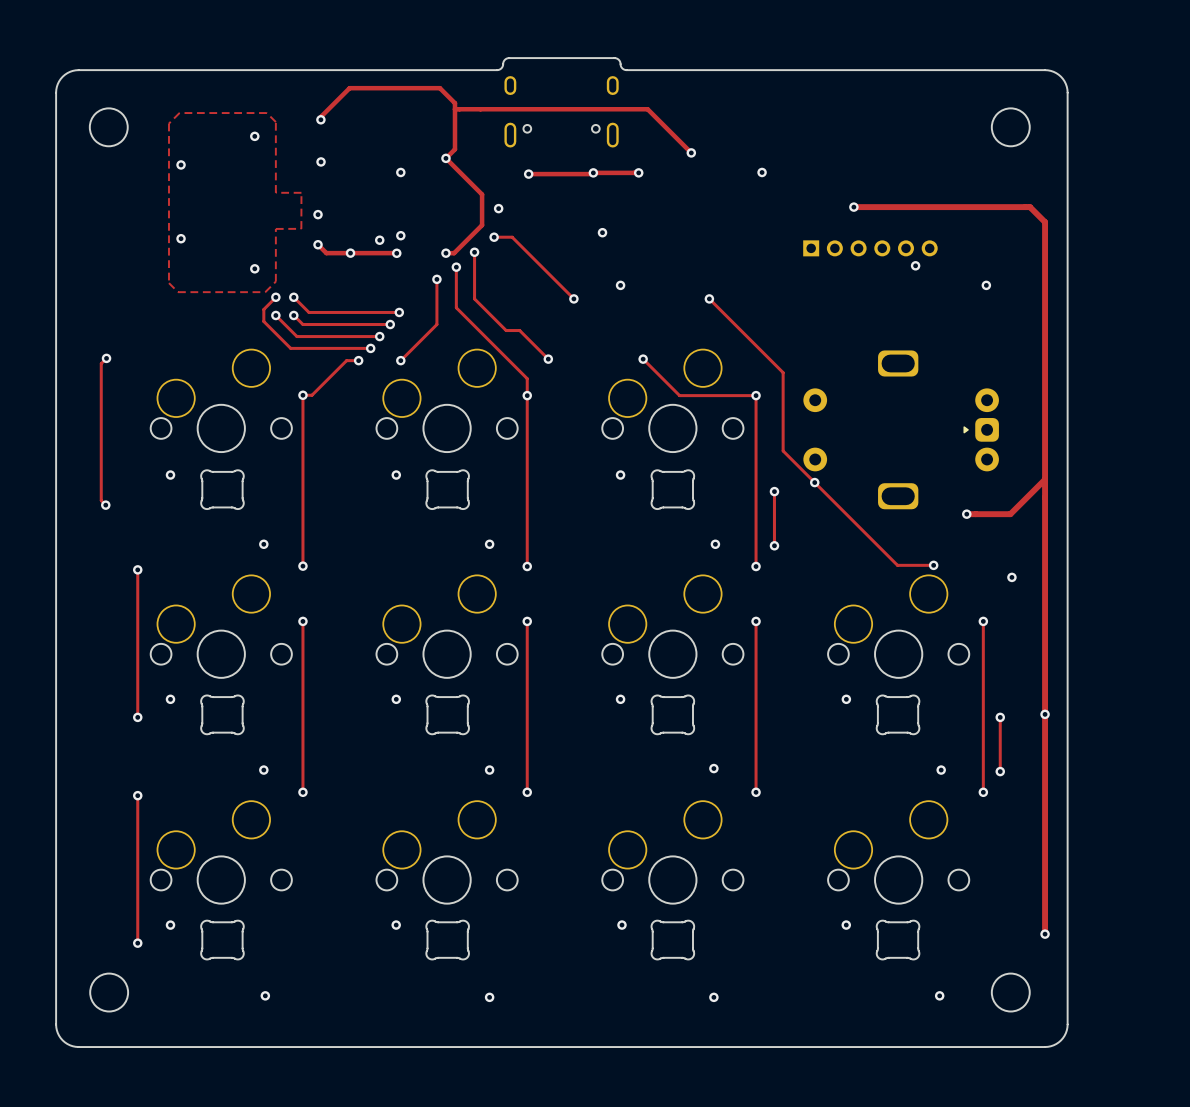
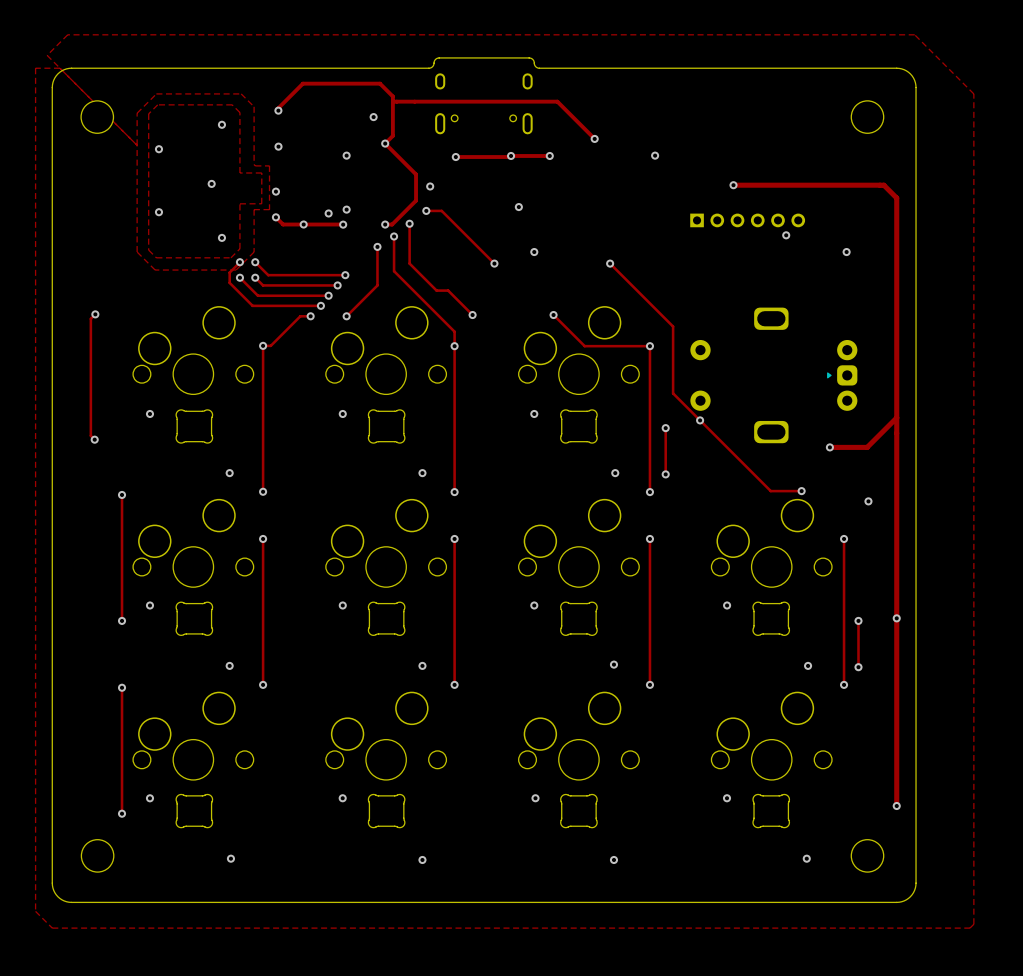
zone outline: none -> (60, 68) (35, 68) (35, 911) (52, 928) (970, 928) (973, 924) (973, 93) (914, 34) (67, 34) (47, 55) (137, 145)
zone outline: none -> (156, 93) (137, 113) (137, 252) (155, 270) (236, 270) (254, 252) (254, 209) (269, 209) (269, 165) (254, 164) (254, 106) (241, 93) (156, 93)
via: none -> (373, 117)
via: none -> (211, 183)

